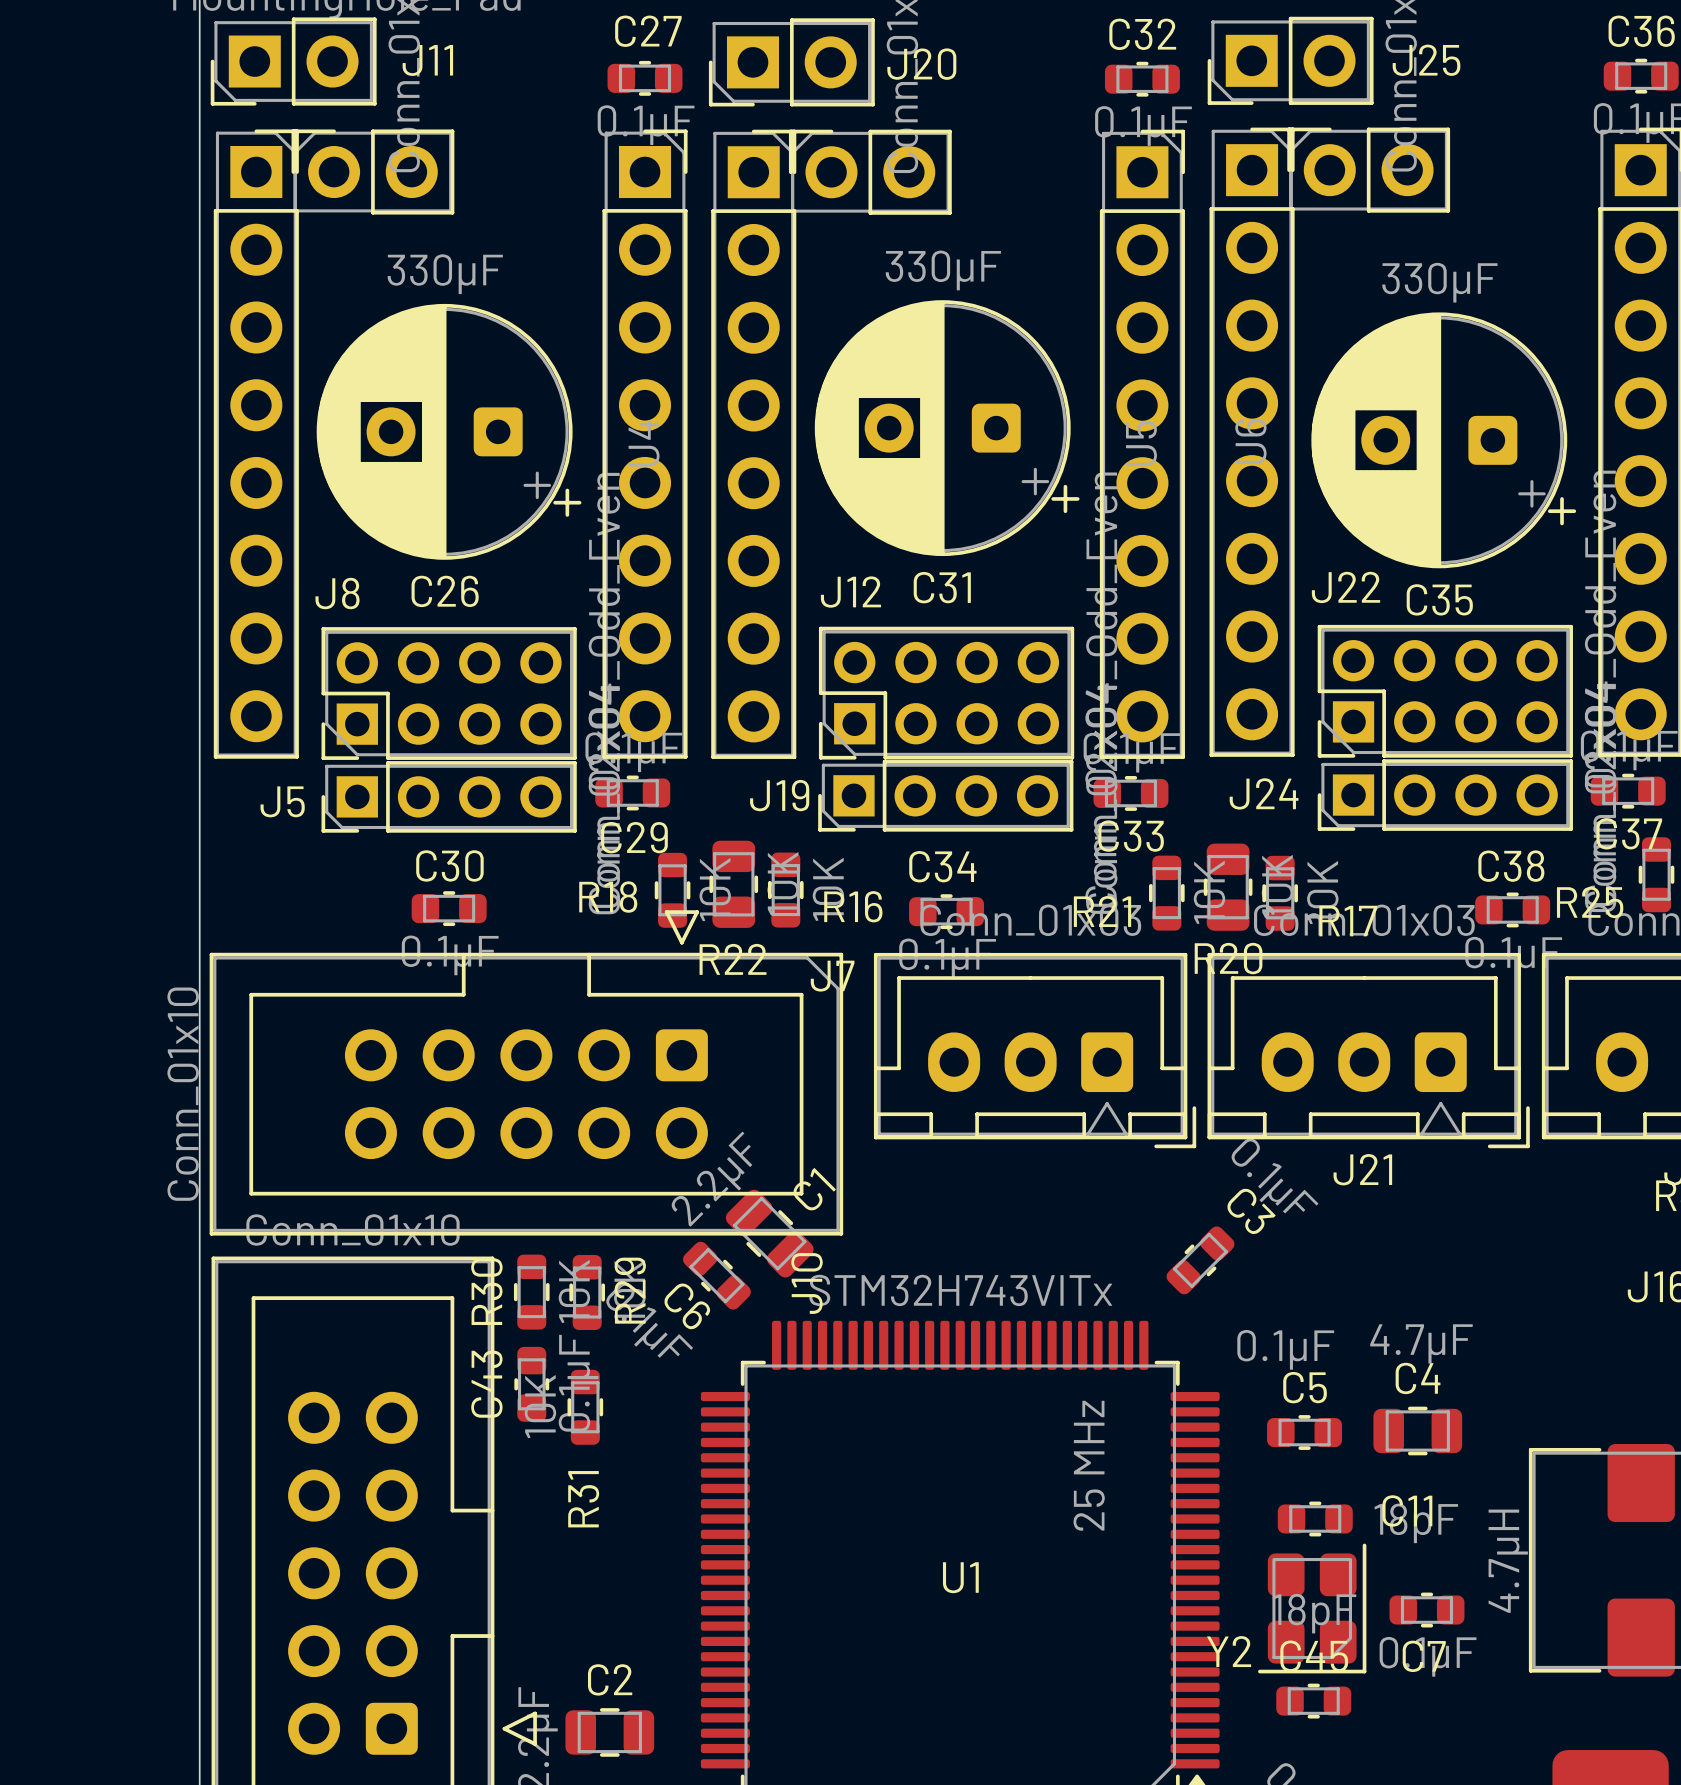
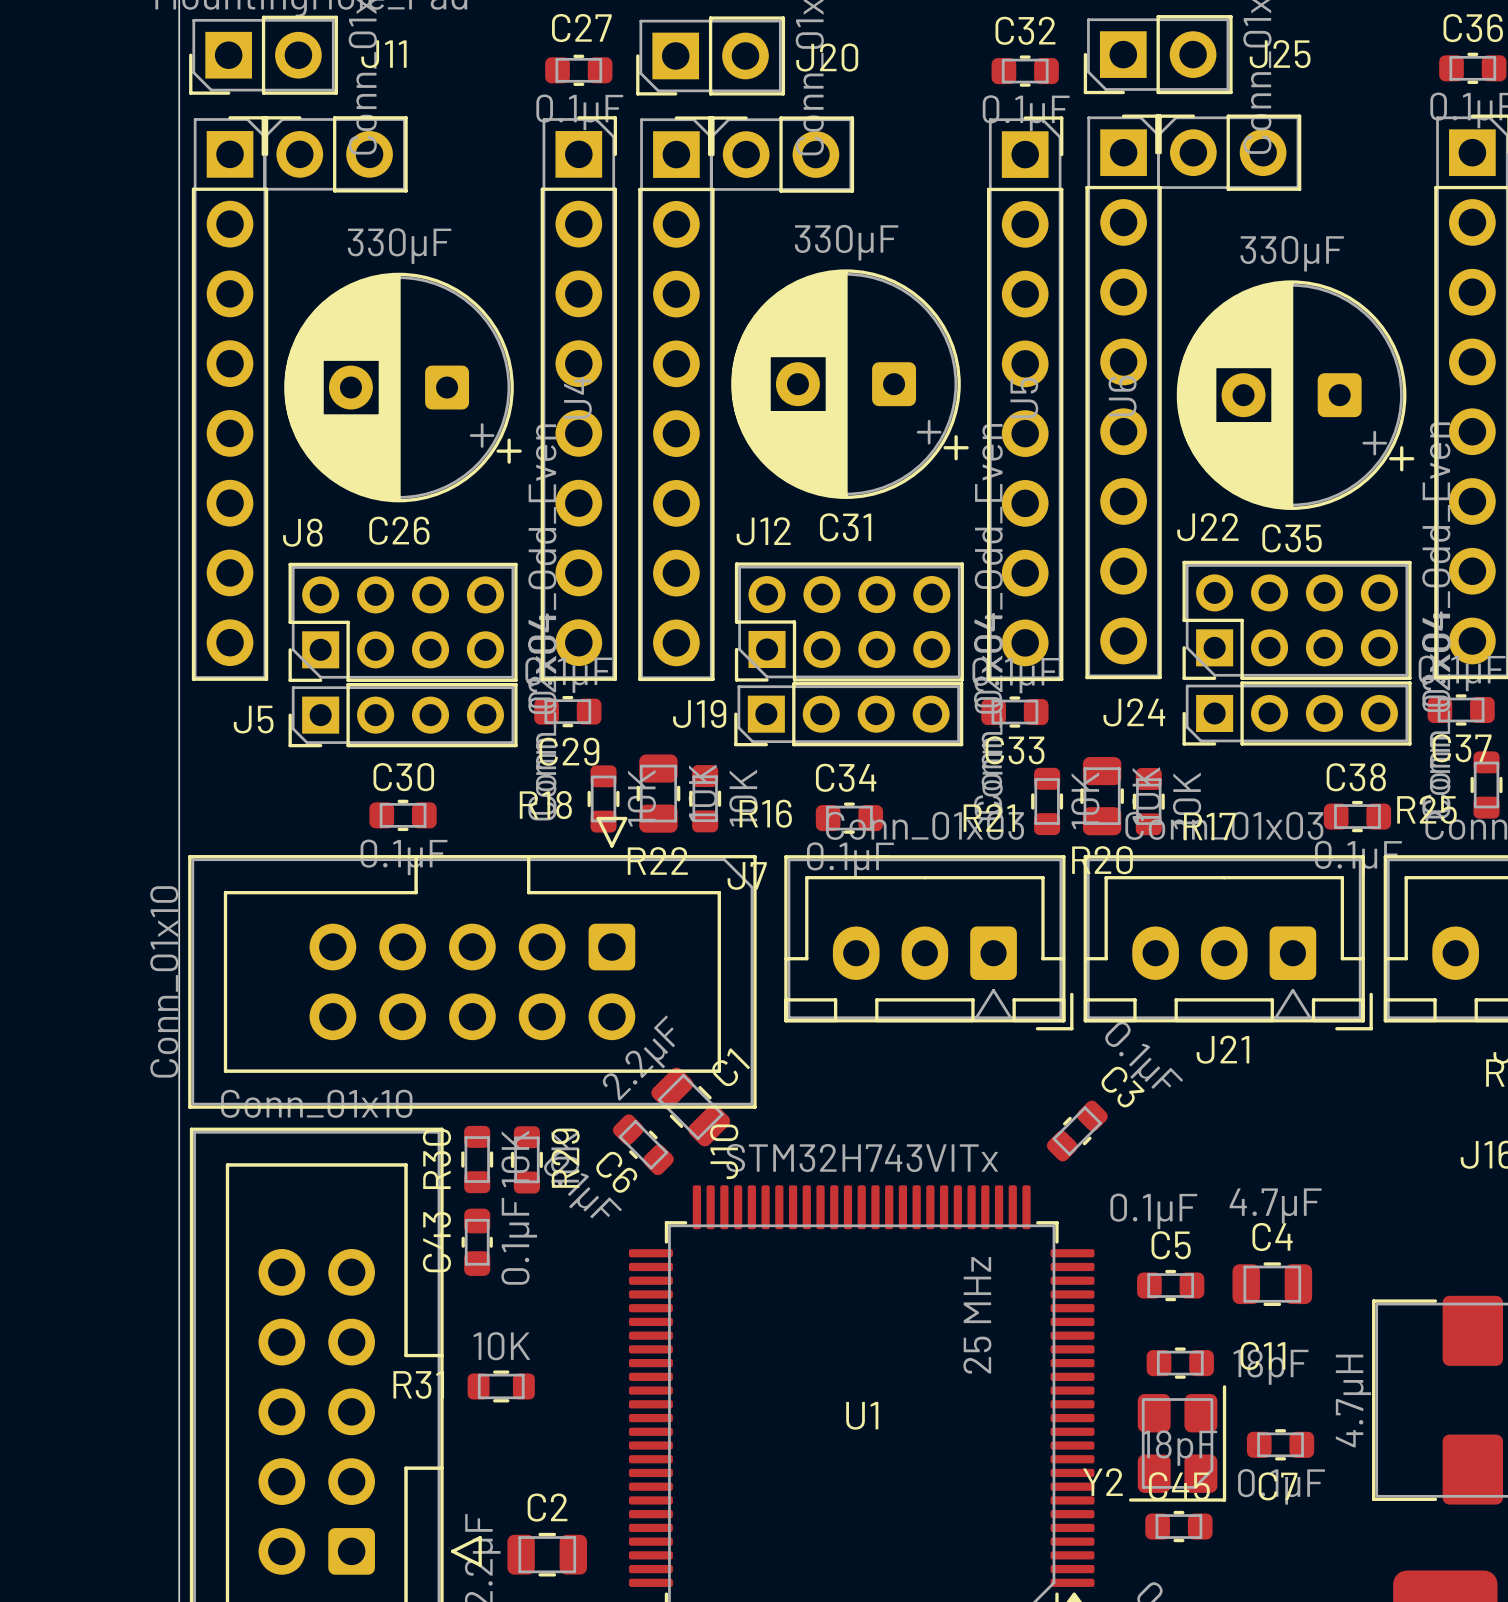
R31 rotation: 0° (585, 1407) -> 90° clockwise (501, 1386)
R31 position: (585, 1407) -> (501, 1386)

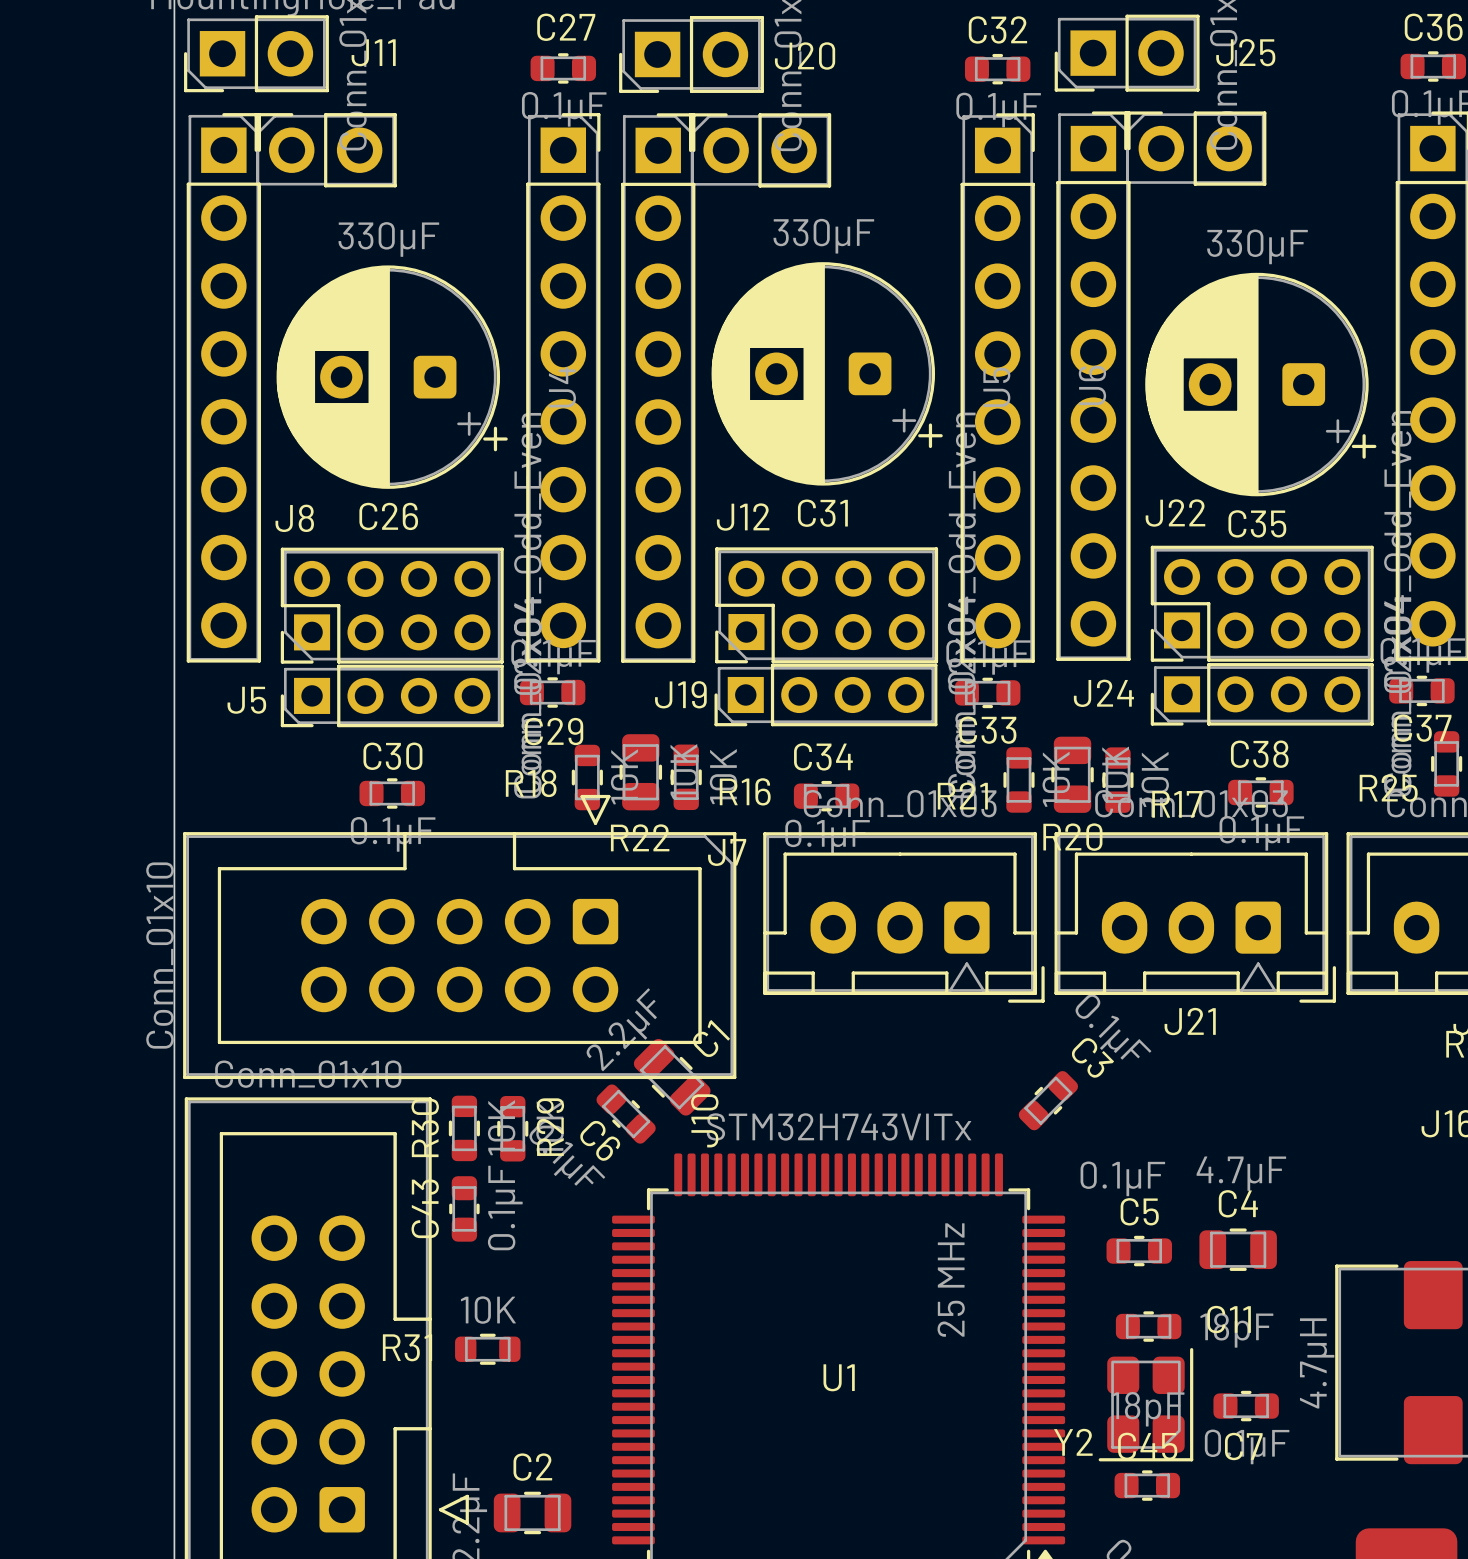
C38 position: (1357, 816) -> (1260, 792)

